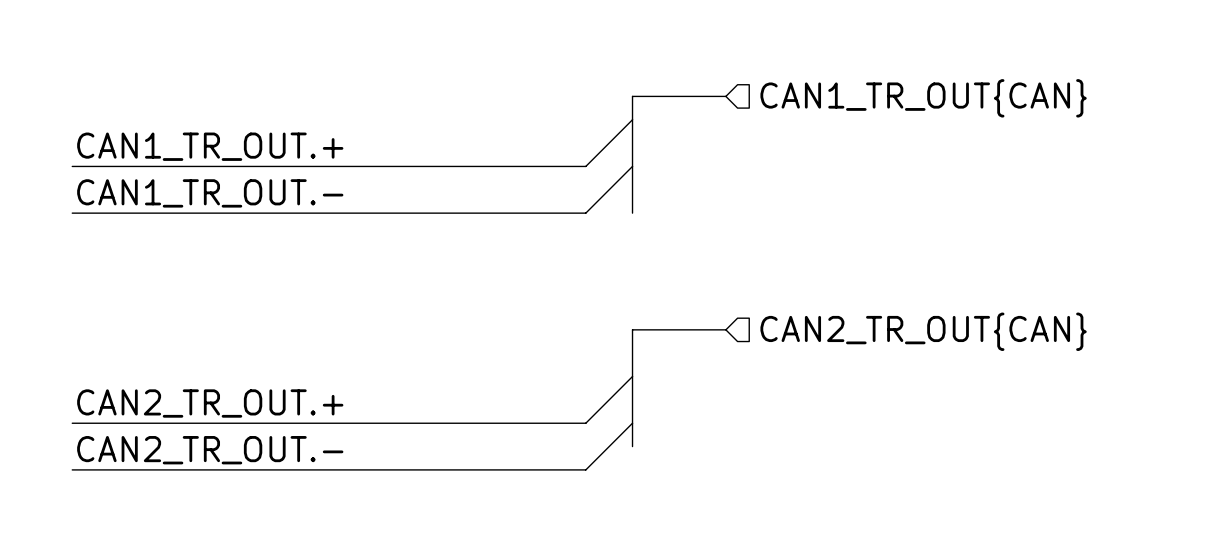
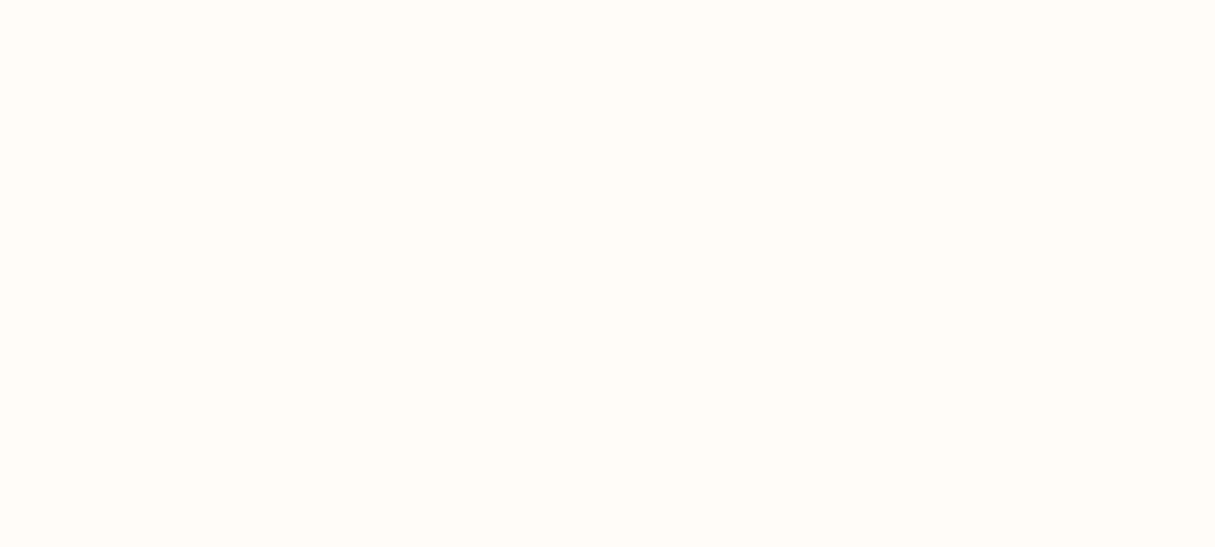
bus: (725, 96) (632, 96) (632, 213) -> none
hierarchical label: CAN1_TR_OUT{CAN} (923, 98) -> none
wire: (632, 119) (585, 166) (72, 166) -> none
label: CAN1_TR_OUT.+ (210, 146) -> none
wire: (632, 166) (585, 213) (72, 213) -> none
label: CAN1_TR_OUT.- (210, 193) -> none
bus: (725, 329) (632, 329) (632, 446) -> none
hierarchical label: CAN2_TR_OUT{CAN} (923, 331) -> none
wire: (632, 376) (585, 423) (72, 423) -> none
label: CAN2_TR_OUT.+ (210, 403) -> none
wire: (632, 423) (585, 469) (72, 469) -> none
label: CAN2_TR_OUT.- (210, 450) -> none

